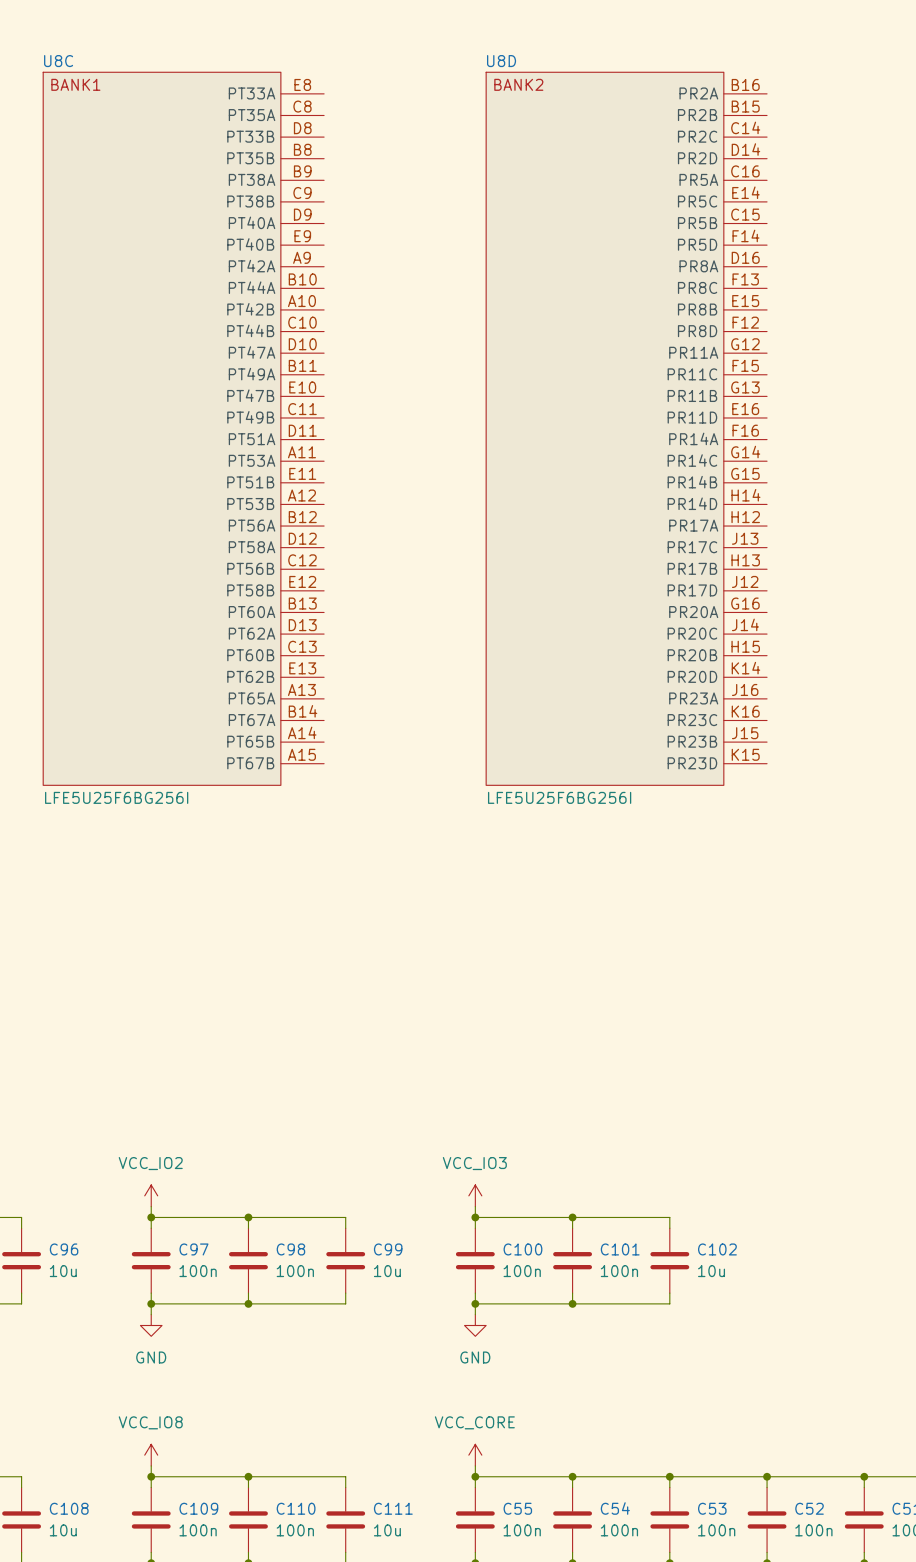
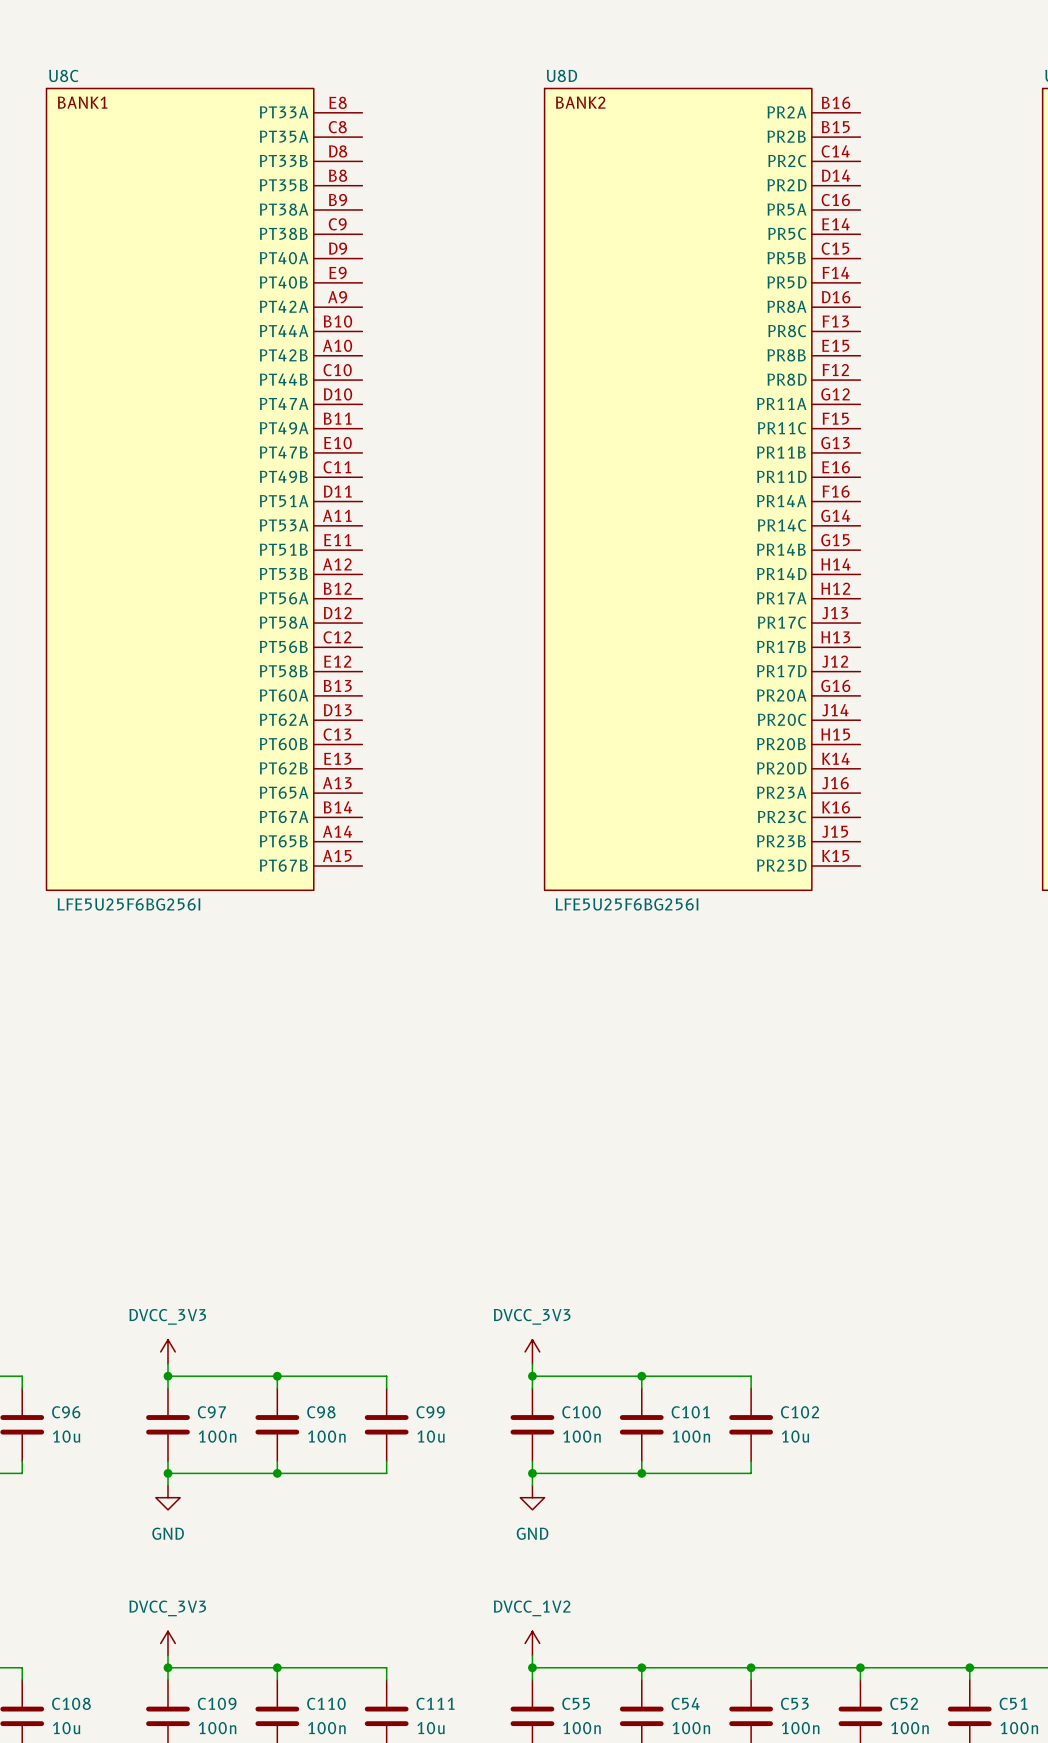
power symbol: VCC_IO2 (151, 1195) -> DVCC_3V3 (167, 1351)
power symbol: VCC_IO3 (475, 1195) -> DVCC_3V3 (532, 1351)
power symbol: VCC_IO8 (151, 1455) -> DVCC_3V3 (167, 1643)
power symbol: VCC_CORE (475, 1455) -> DVCC_1V2 (532, 1643)

